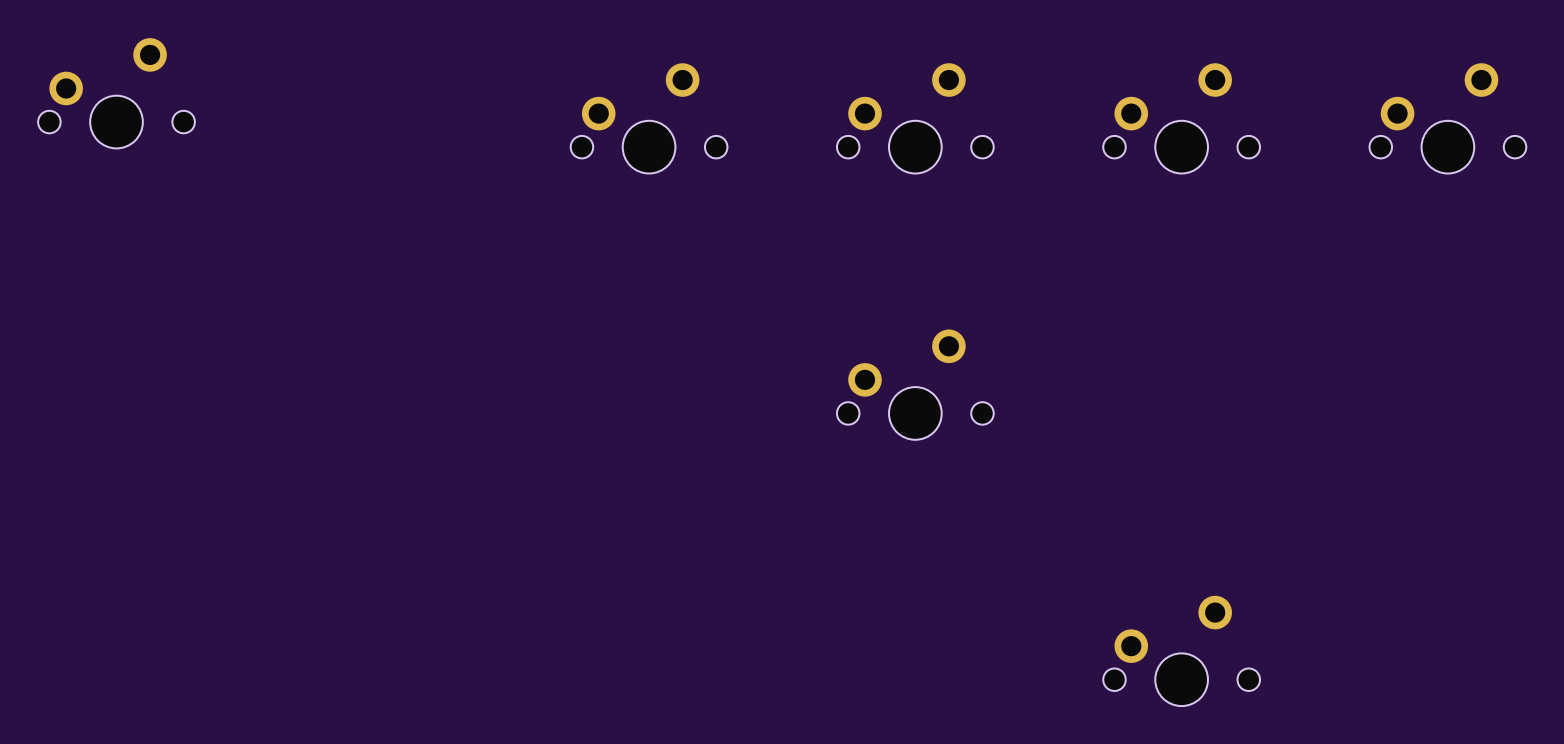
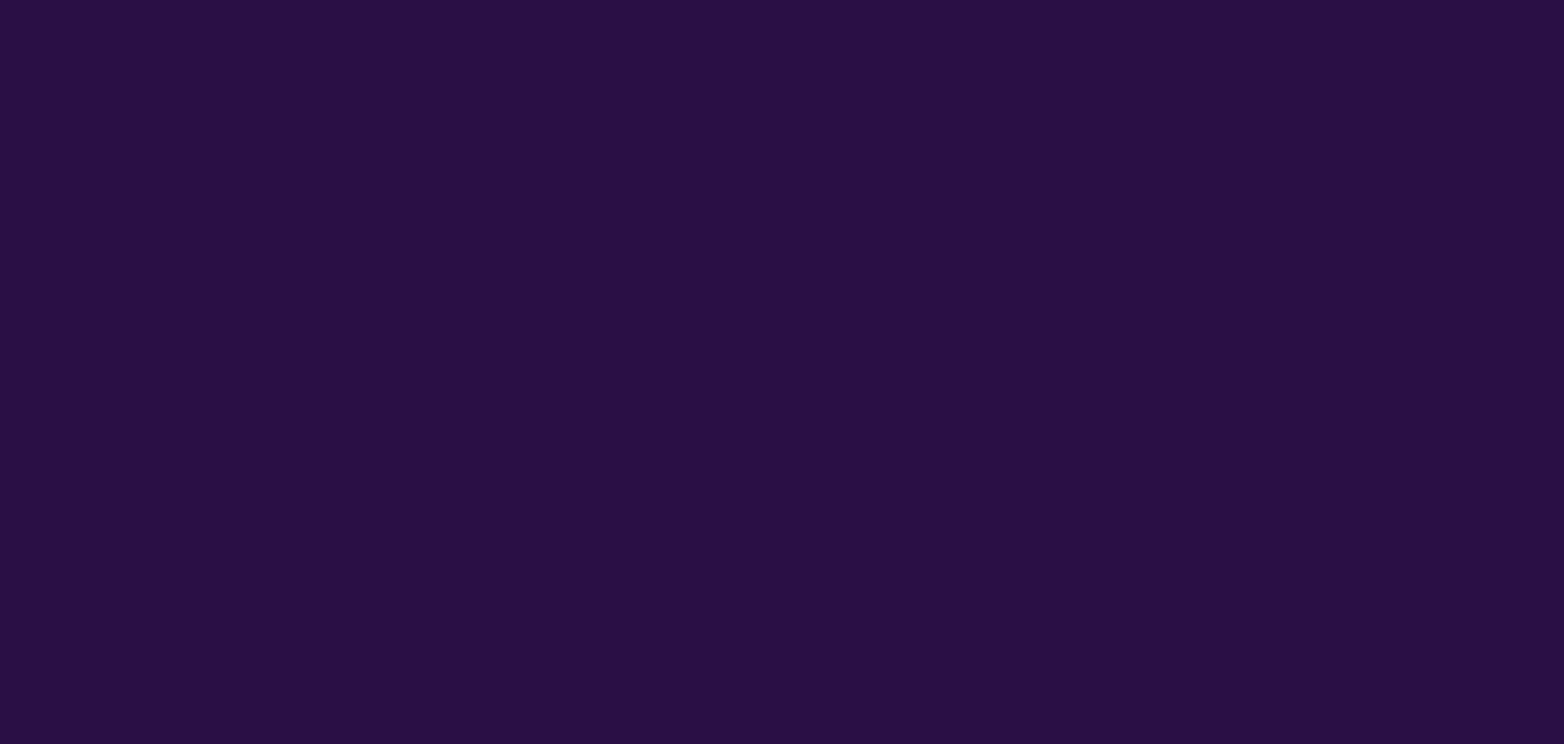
part: (116, 93) -> none
part: (649, 118) -> none
part: (915, 118) -> none
part: (1181, 118) -> none
part: (1447, 118) -> none
part: (915, 384) -> none
part: (1181, 650) -> none

